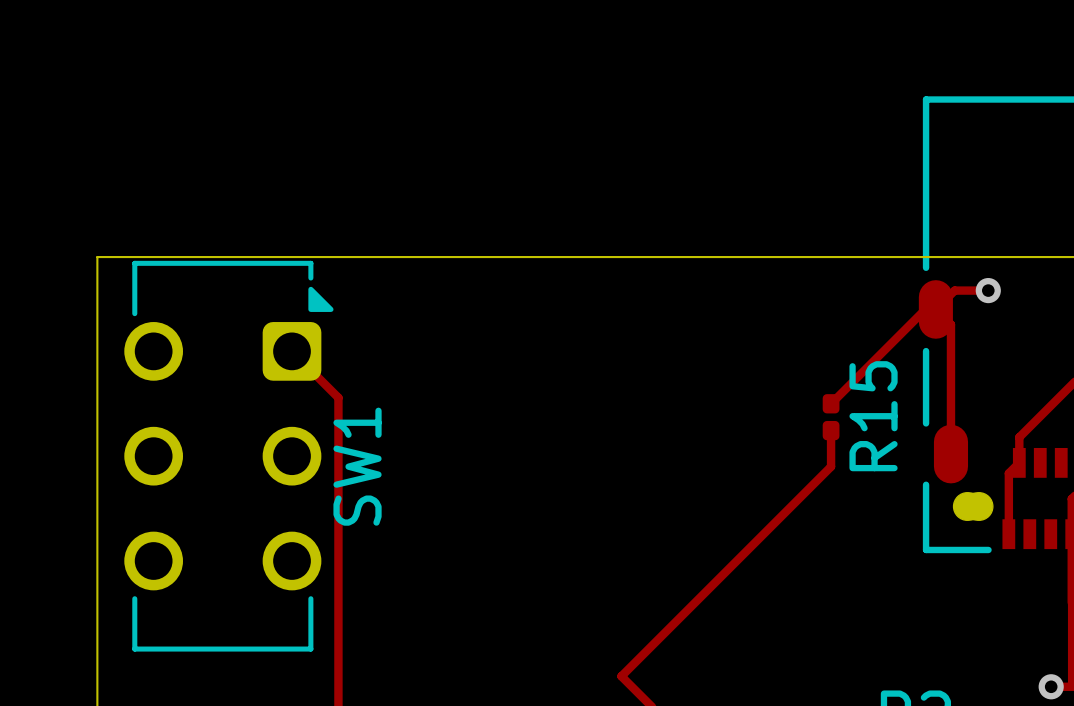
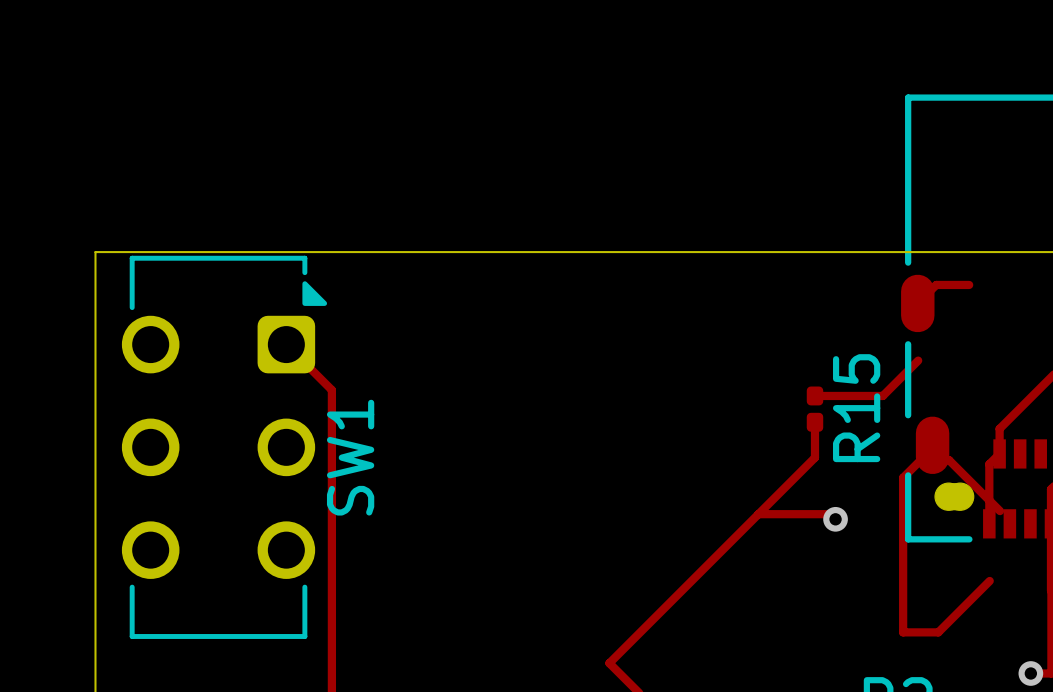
via: (988, 290) -> none
track: (831, 403) (925, 309) (935, 309) (950, 324) (950, 454) -> (814, 395) (882, 395) (918, 360)
track: none -> (1000, 511) (949, 460) (920, 460) (903, 477) (903, 632) (938, 632) (989, 580)
track: none -> (758, 514) (830, 514) (835, 519)
via: none -> (835, 519)

